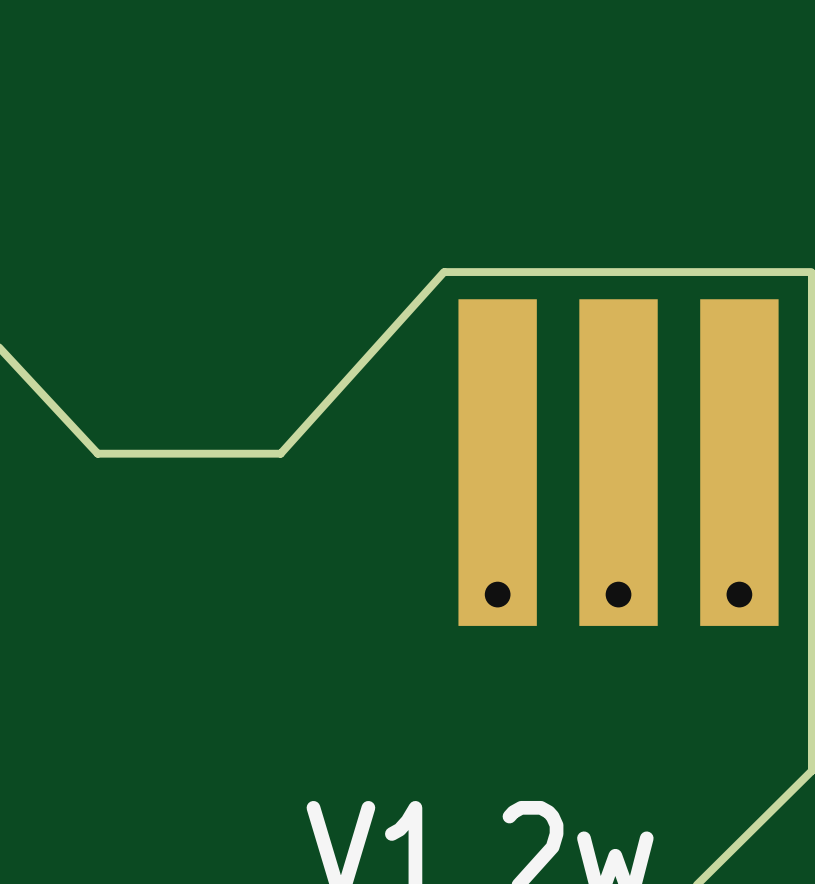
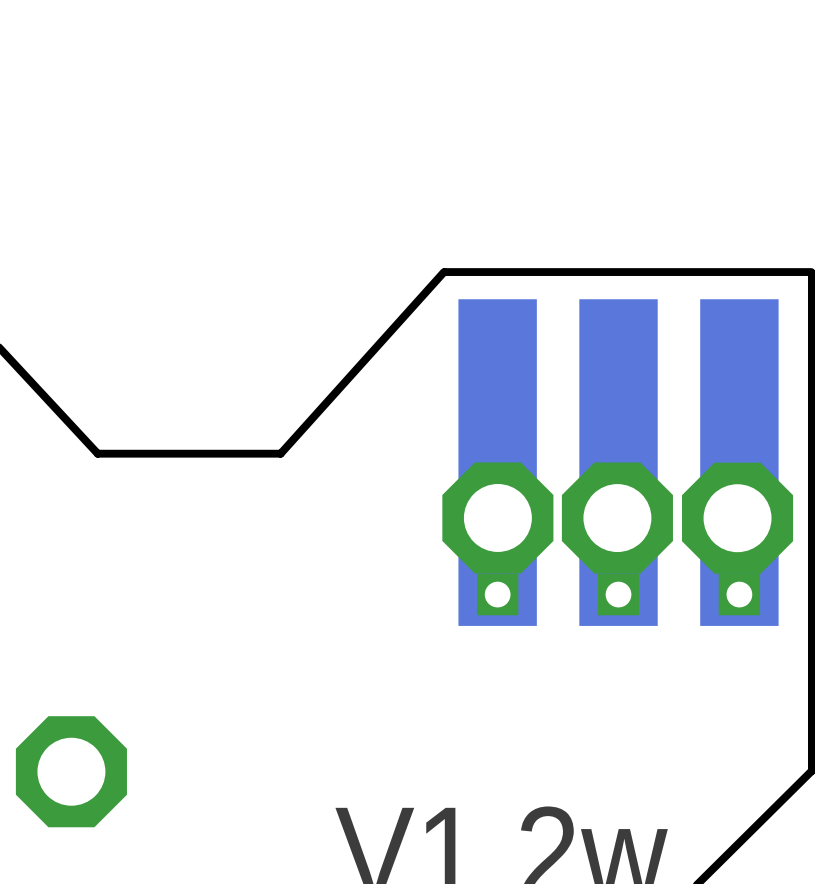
part: none -> (497, 517)
part: none -> (617, 518)
part: none -> (737, 518)
part: none -> (71, 771)

